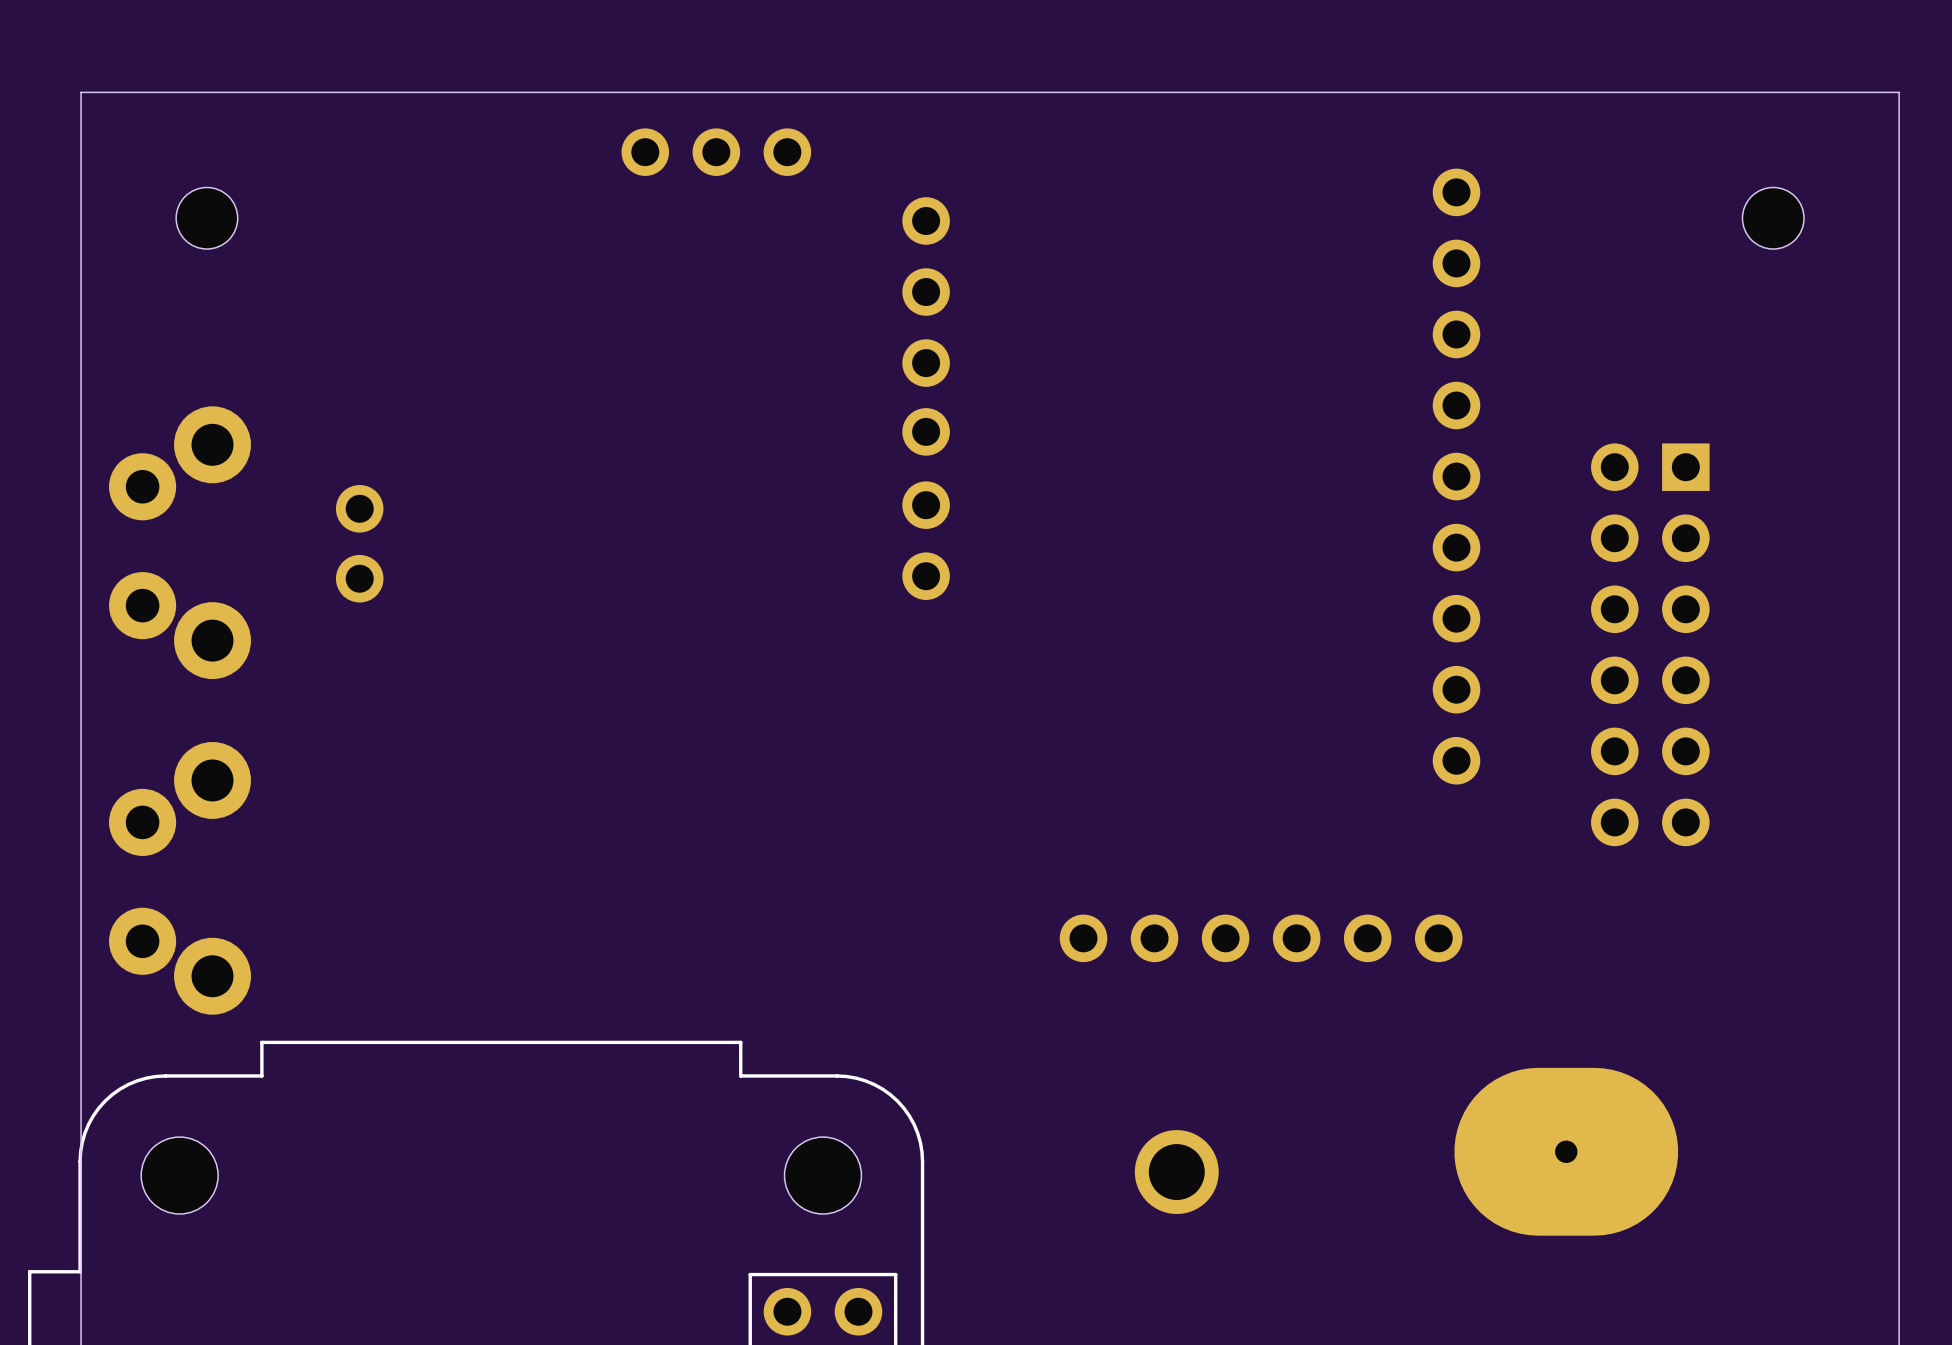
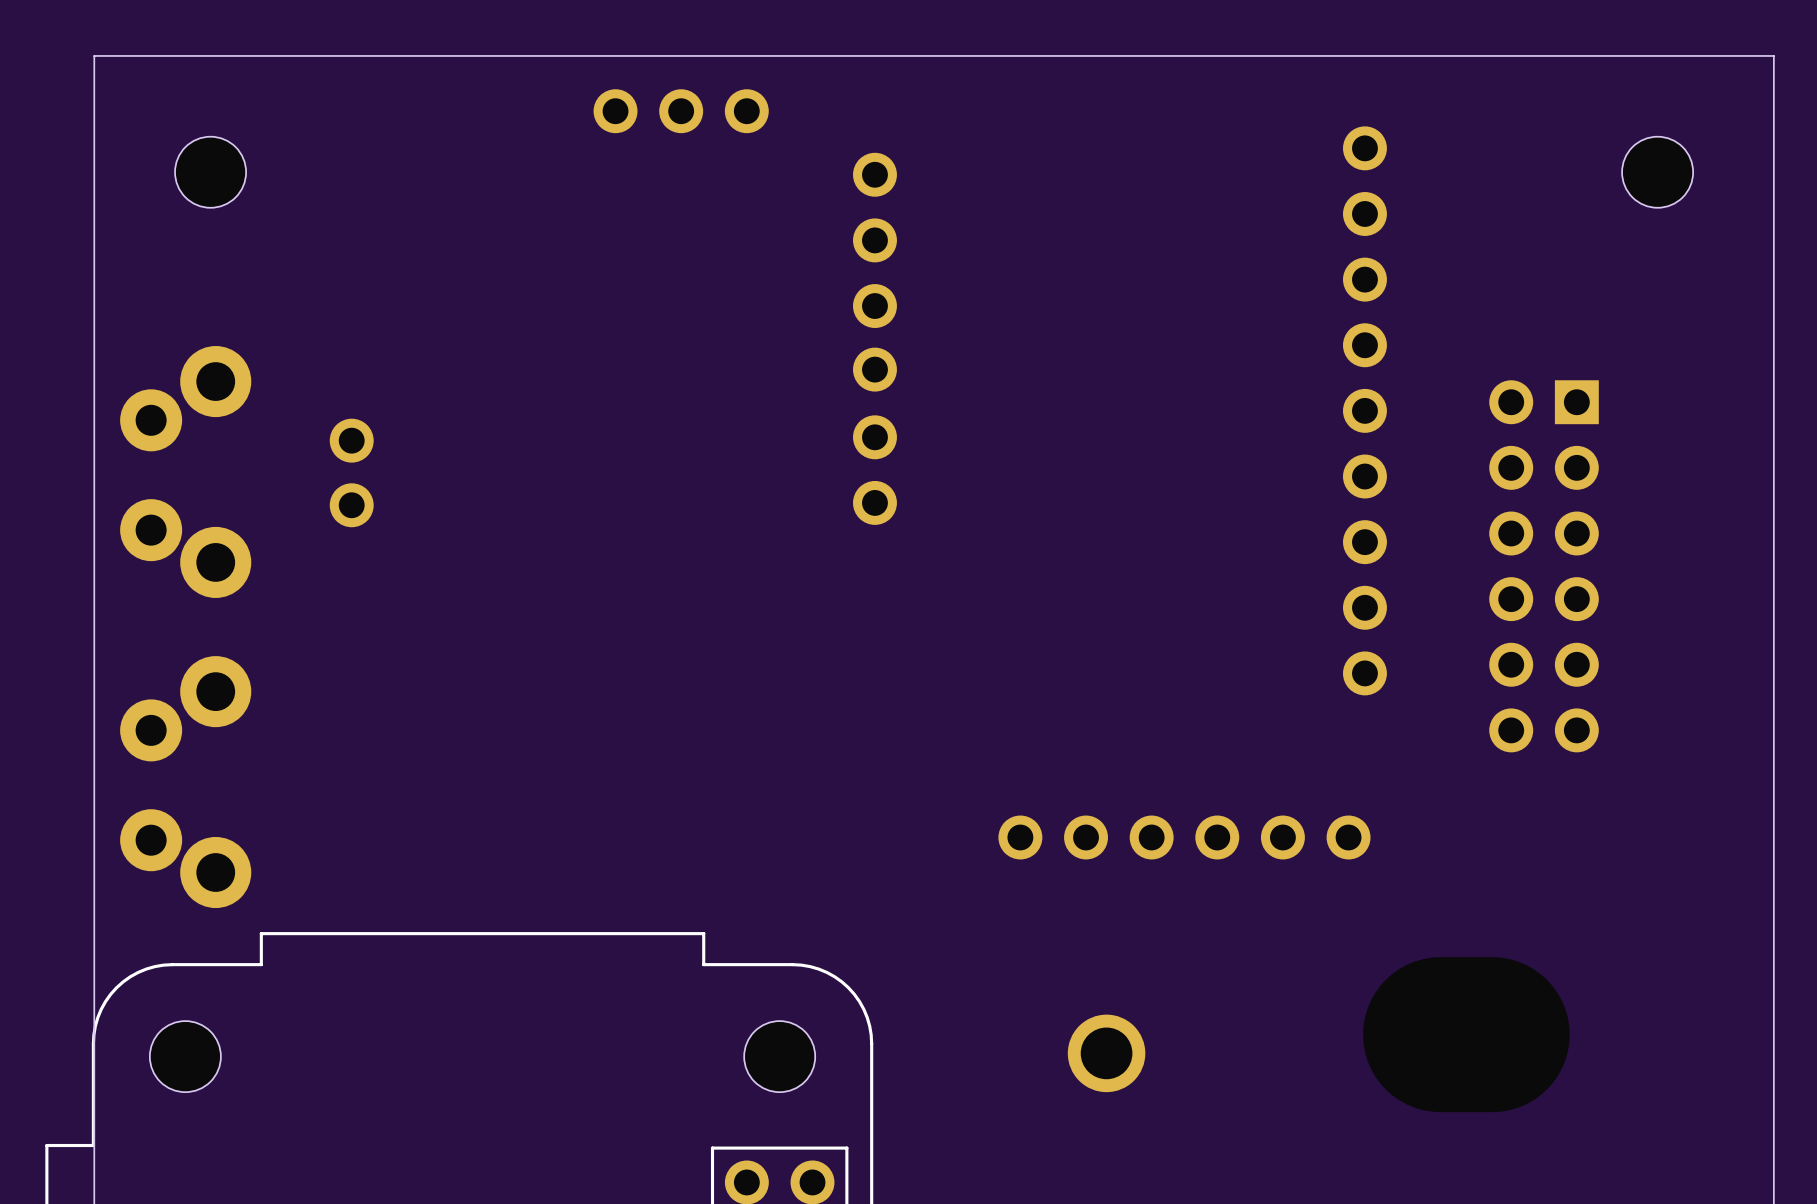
part footprint: [176, 187, 238, 250] -> [175, 136, 247, 208]
part footprint: [1742, 187, 1805, 250] -> [1622, 136, 1694, 208]
part footprint: [1454, 1067, 1679, 1236] -> [1363, 957, 1570, 1113]

